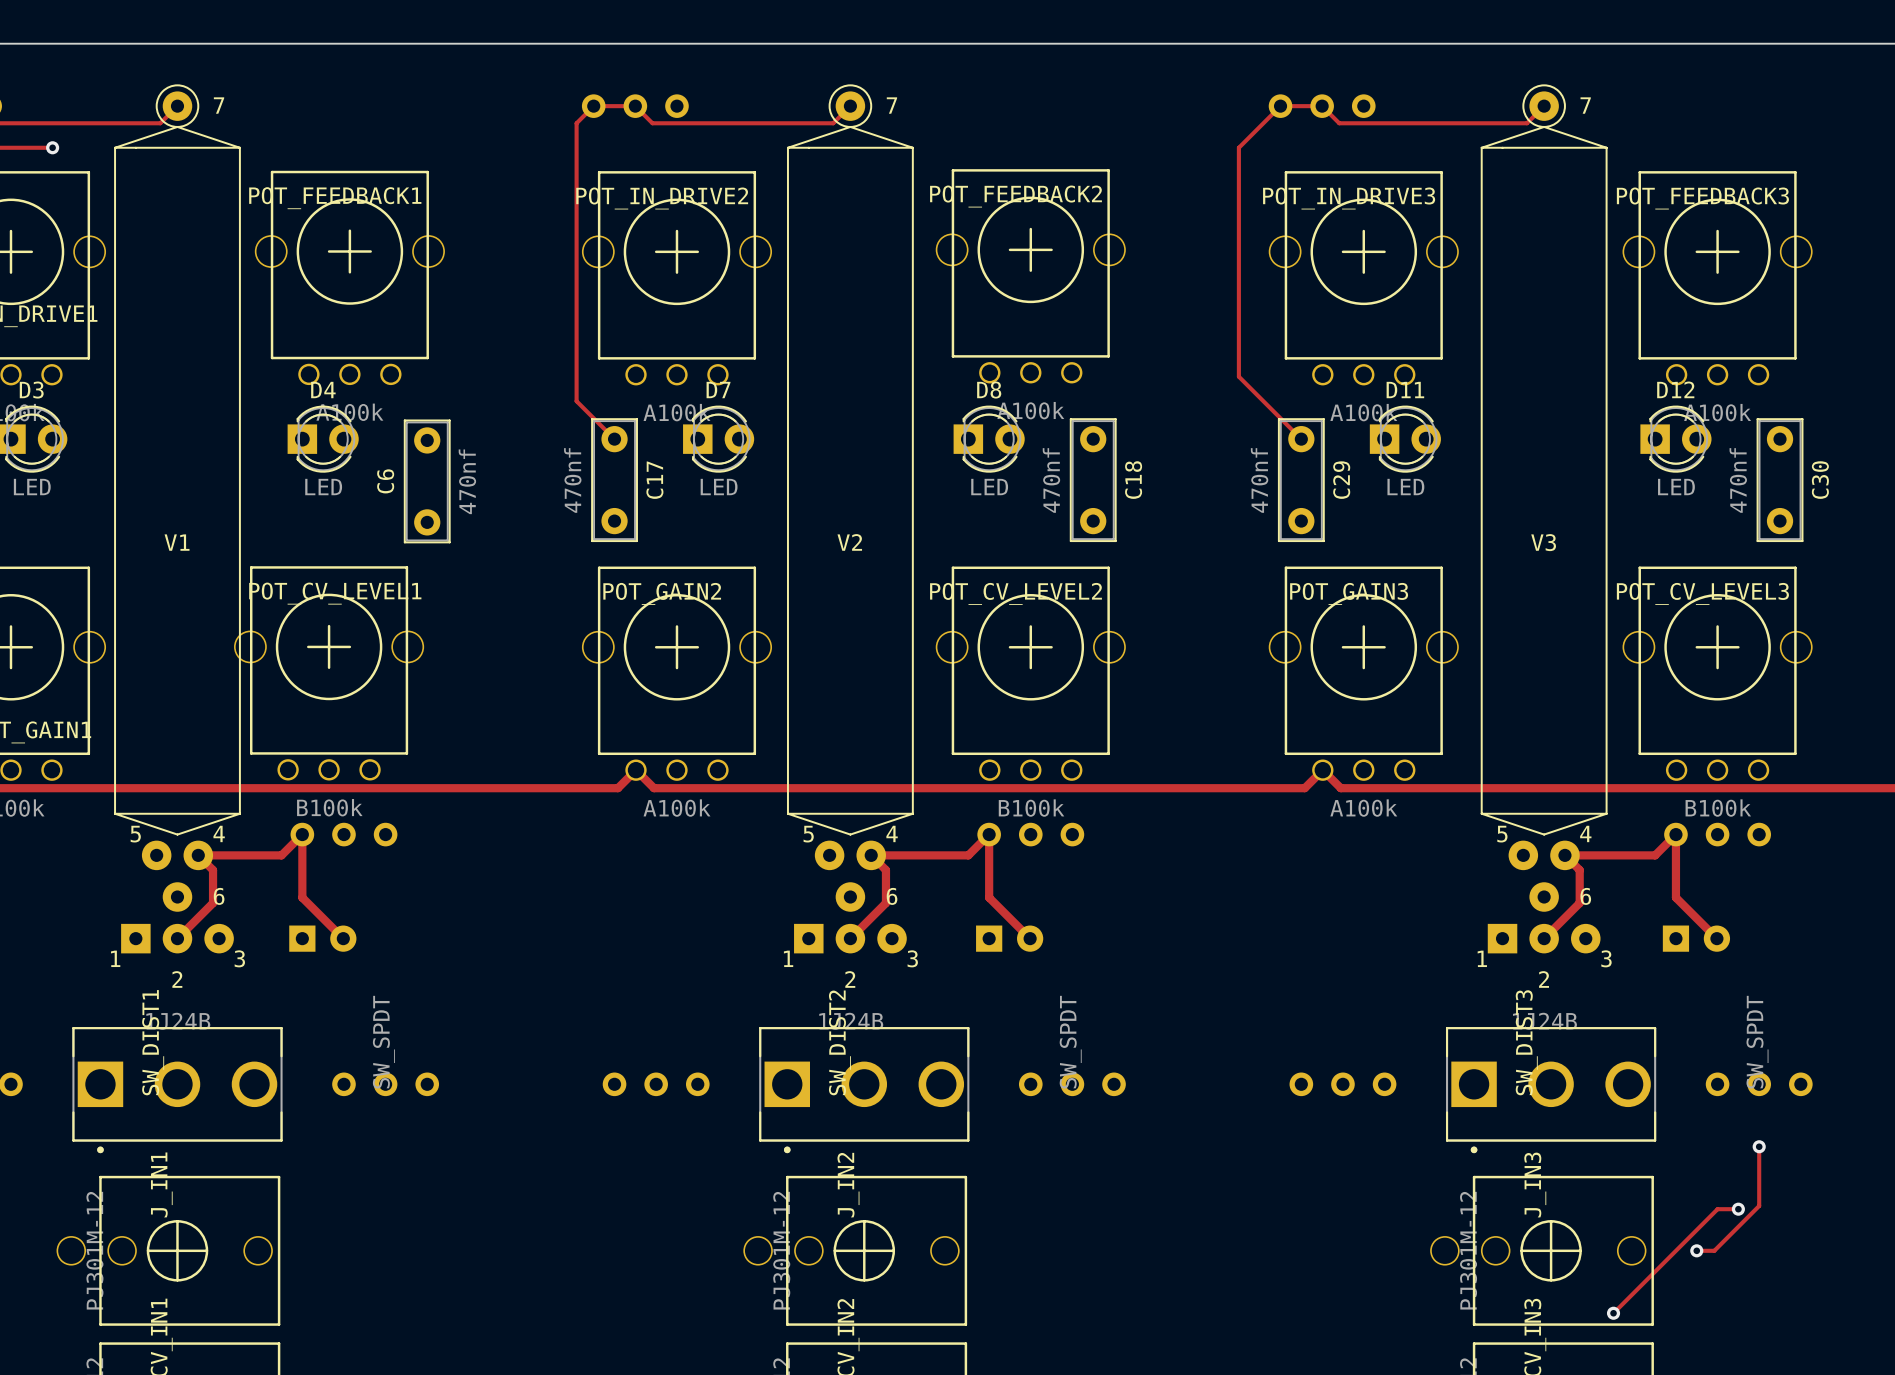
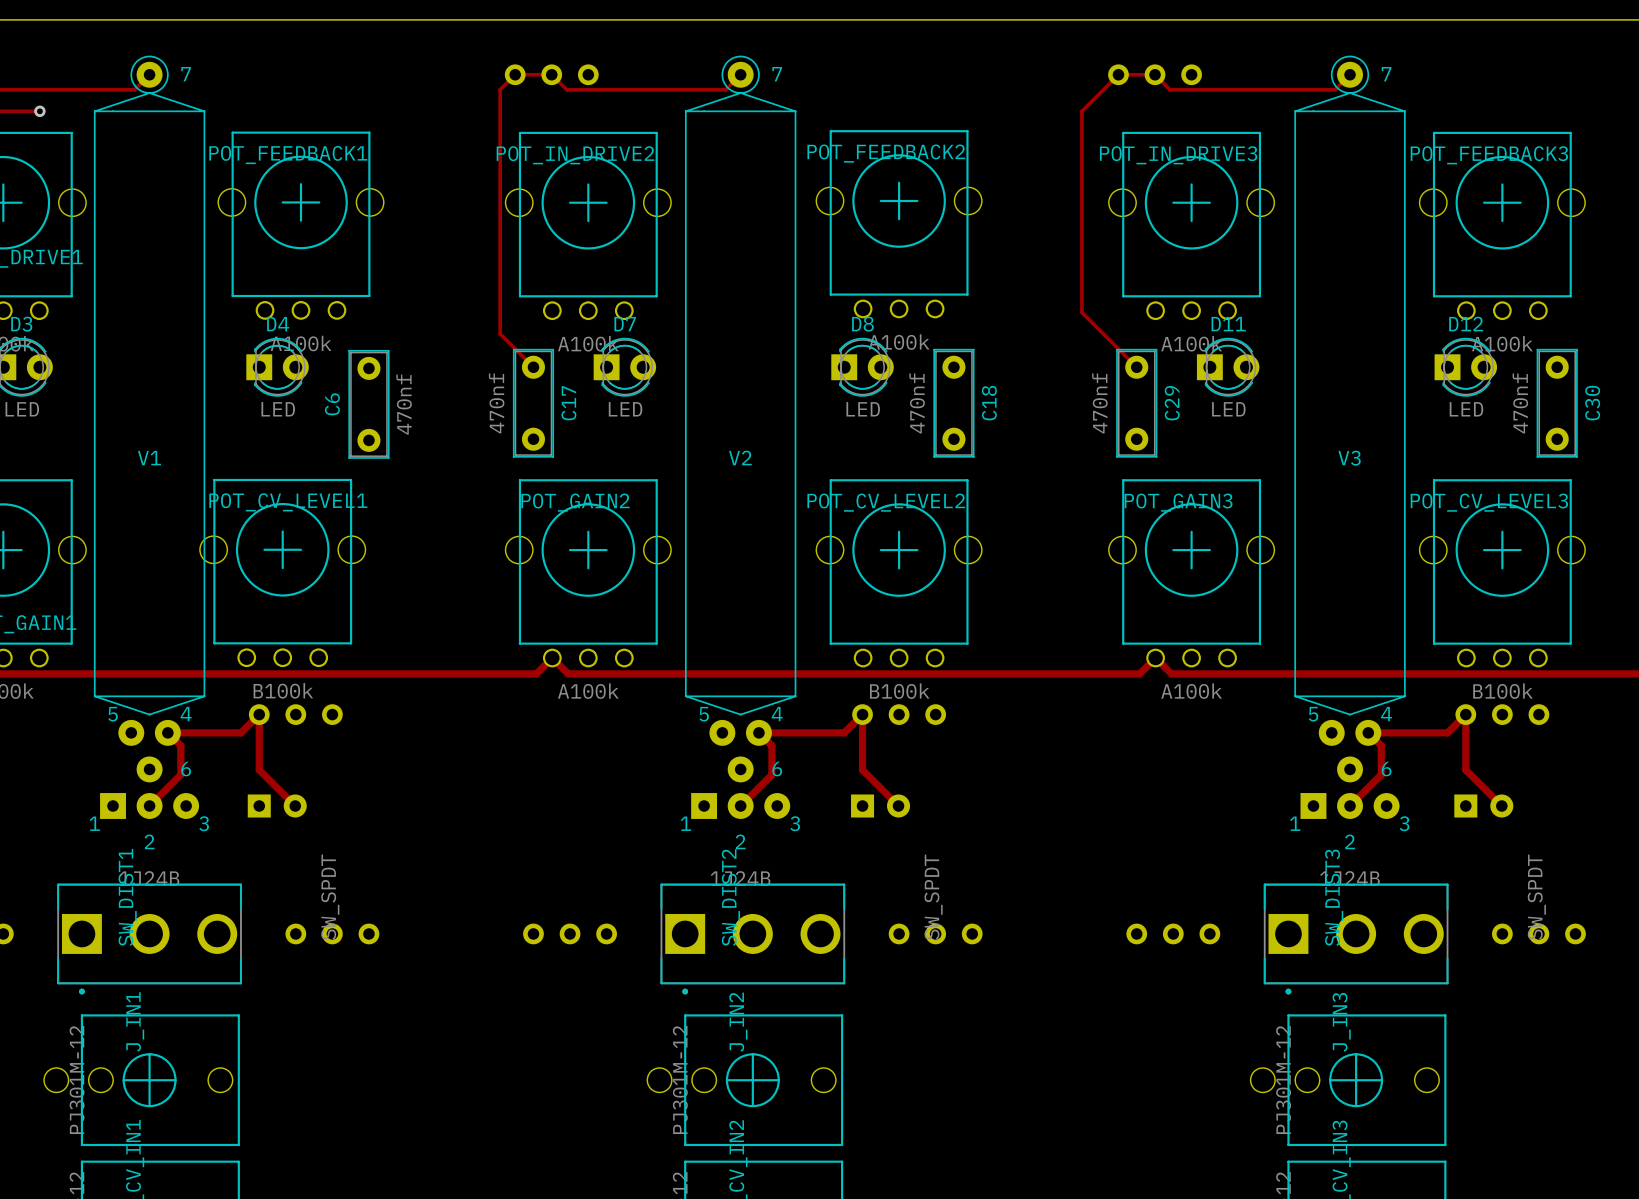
track: (1759, 1146) (1759, 1205) (1714, 1250) (1696, 1250) -> none
via: (1759, 1146) -> none
track: (1738, 1209) (1717, 1209) (1613, 1313) -> none
via: (1738, 1209) -> none
via: (1696, 1250) -> none
via: (1613, 1313) -> none

